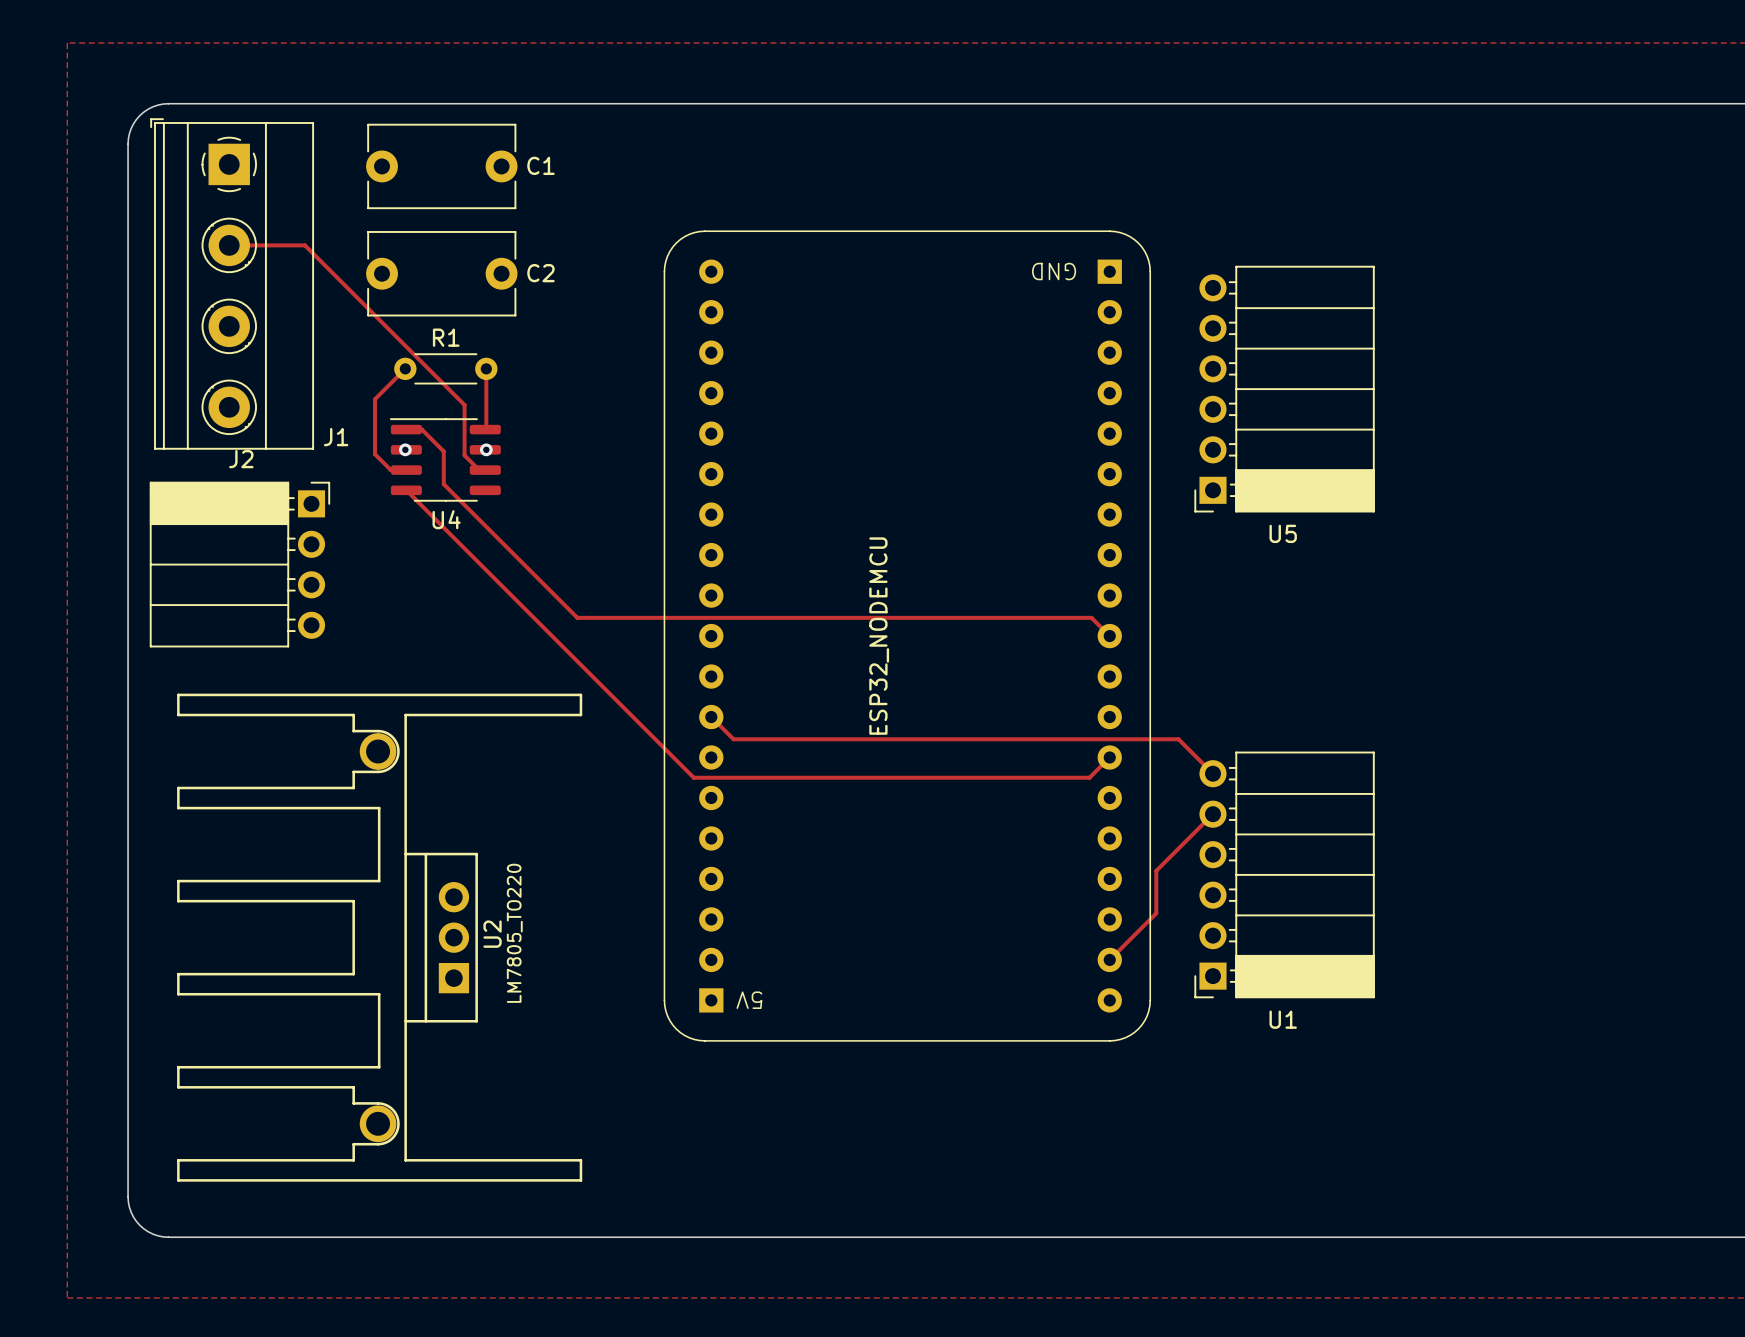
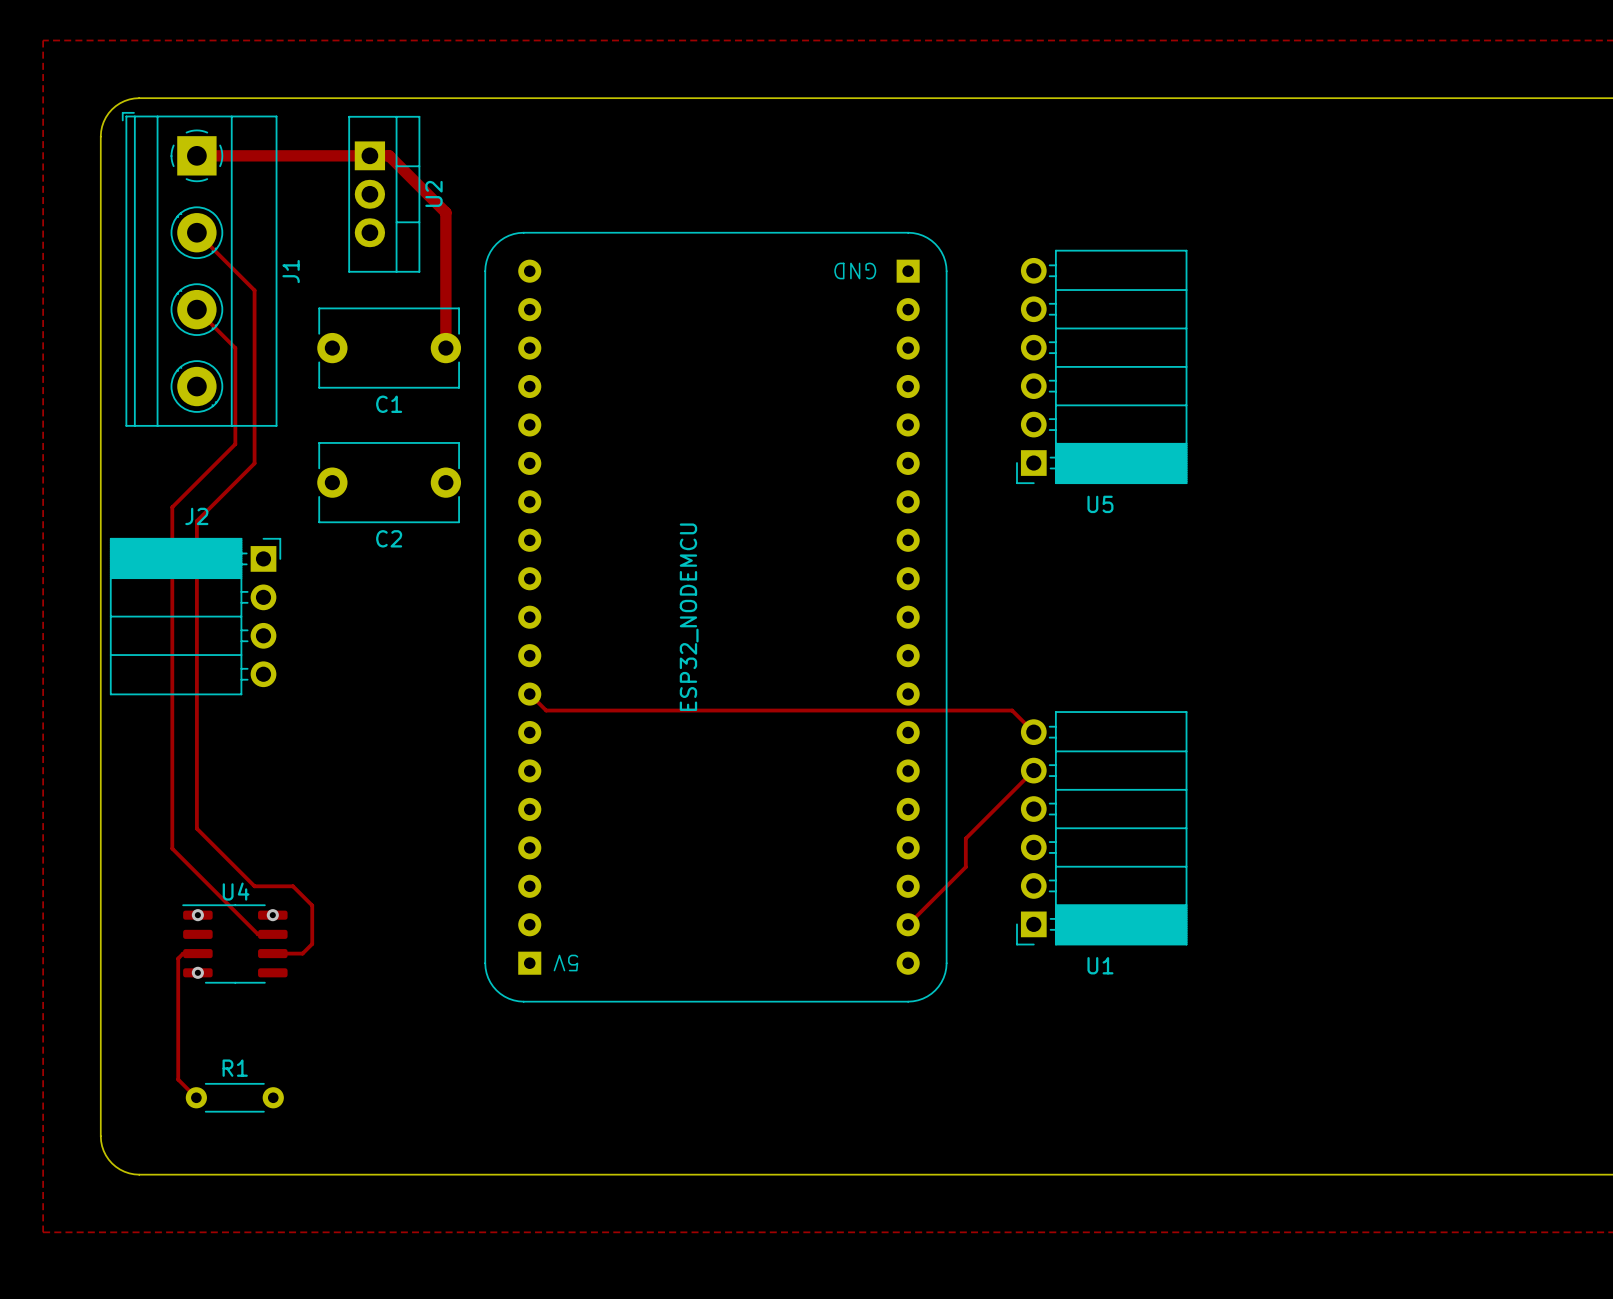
track: none -> (196, 155) (389, 155) (445, 212) (445, 348)
C1 name position: C1 (540, 165) -> C1 (389, 404)
C1 position: (441, 166) -> (389, 348)
track: (229, 245) (304, 245) (464, 404) (464, 455) (479, 470) (485, 470) -> (196, 232) (254, 290) (254, 463) (196, 521) (196, 828) (254, 886) (293, 886) (312, 905) (312, 943) (302, 953) (272, 953)
C2 position: (441, 273) -> (389, 482)
C2 name position: C2 (540, 273) -> C2 (389, 538)
track: none -> (196, 309) (235, 348) (235, 444) (172, 507) (172, 848) (258, 934) (272, 934)
track: (405, 368) (374, 399) (374, 454) (390, 470) (406, 470) -> none
R1 position: (445, 368) -> (234, 1097)
track: (486, 368) (485, 429) -> none
U5 position: (1284, 389) -> (1101, 366)
track: (406, 429) (421, 429) (443, 451) (443, 484) (577, 617) (1091, 617) (1109, 636) -> none
J1 name rotation: 0° (336, 437) -> 90° counterclockwise (291, 271)
J1 name position: J1 (336, 437) -> J1 (291, 271)
via: (405, 449) -> none
via: (486, 449) -> none
U4 position: (445, 459) -> (234, 943)
track: (406, 490) (693, 777) (1089, 777) (1109, 757) -> none
U4 name position: U4 (446, 519) -> U4 (236, 891)
J2 position: (239, 564) -> (195, 616)
part position: (907, 636) -> (715, 617)
U2 footprint: [177, 693, 583, 1182] -> [348, 115, 421, 273]
track: (711, 717) (733, 739) (1178, 739) (1212, 773) -> none
track: none -> (529, 694) (546, 710) (1012, 710) (1033, 732)
track: none -> (1033, 770) (965, 838) (965, 867) (908, 924)
track: (1212, 814) (1156, 870) (1156, 913) (1109, 959) -> none
U1 position: (1284, 874) -> (1101, 828)
U2 value: LM7805_TO220 (514, 933) -> none
U2 name position: U2 (492, 934) -> U2 (433, 193)
via: none -> (197, 915)
via: none -> (272, 915)
track: none -> (197, 953) (183, 953) (178, 958) (178, 1079) (196, 1097)
via: none -> (197, 972)

